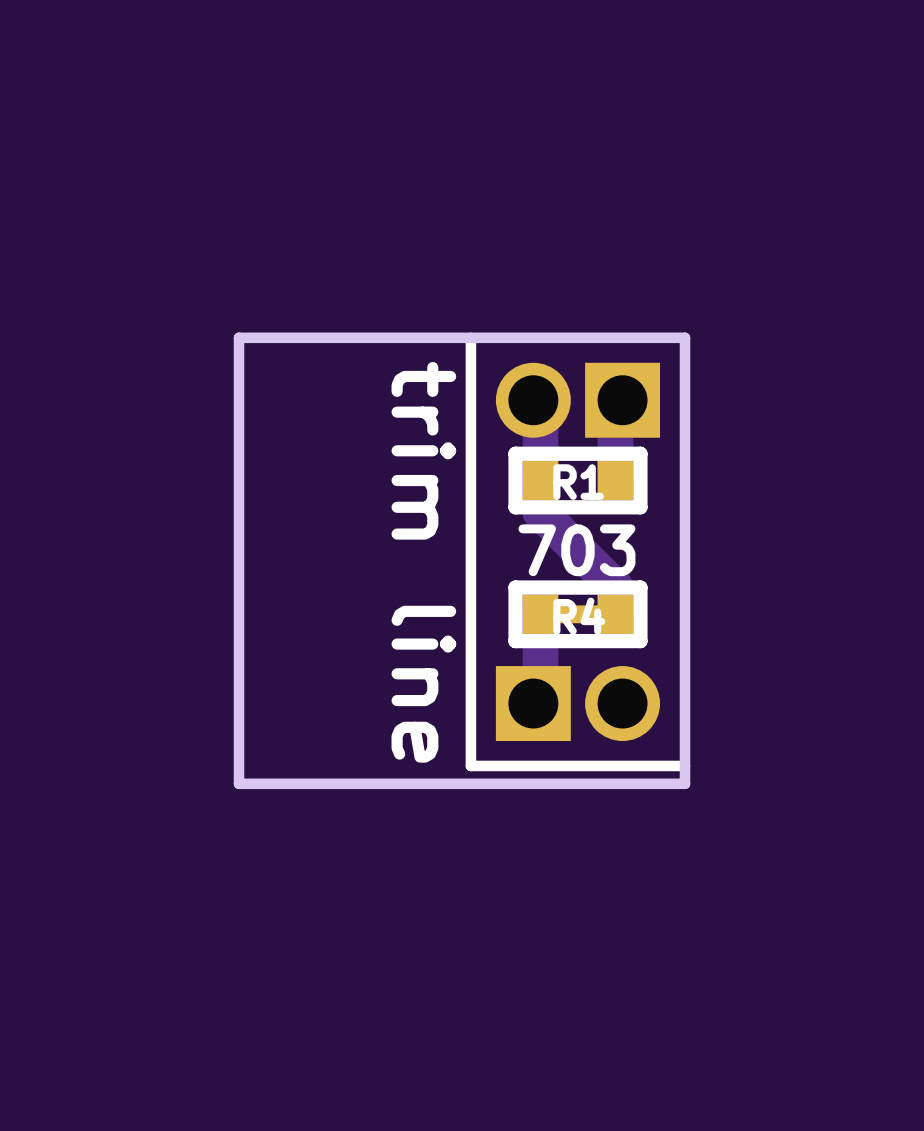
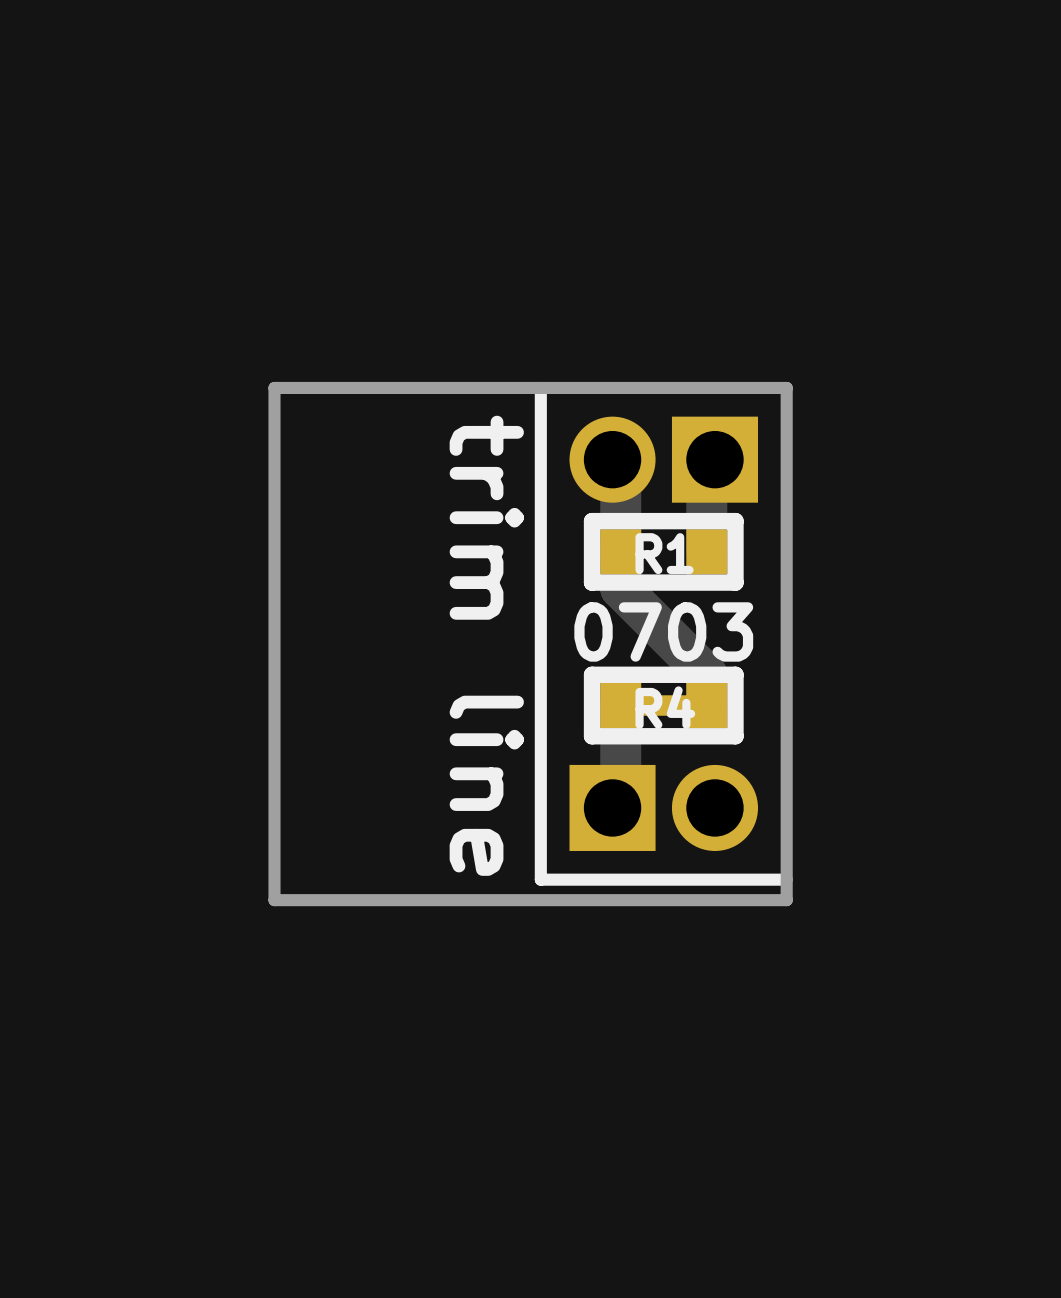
text: 703 (576, 550) -> 0703 (663, 631)

